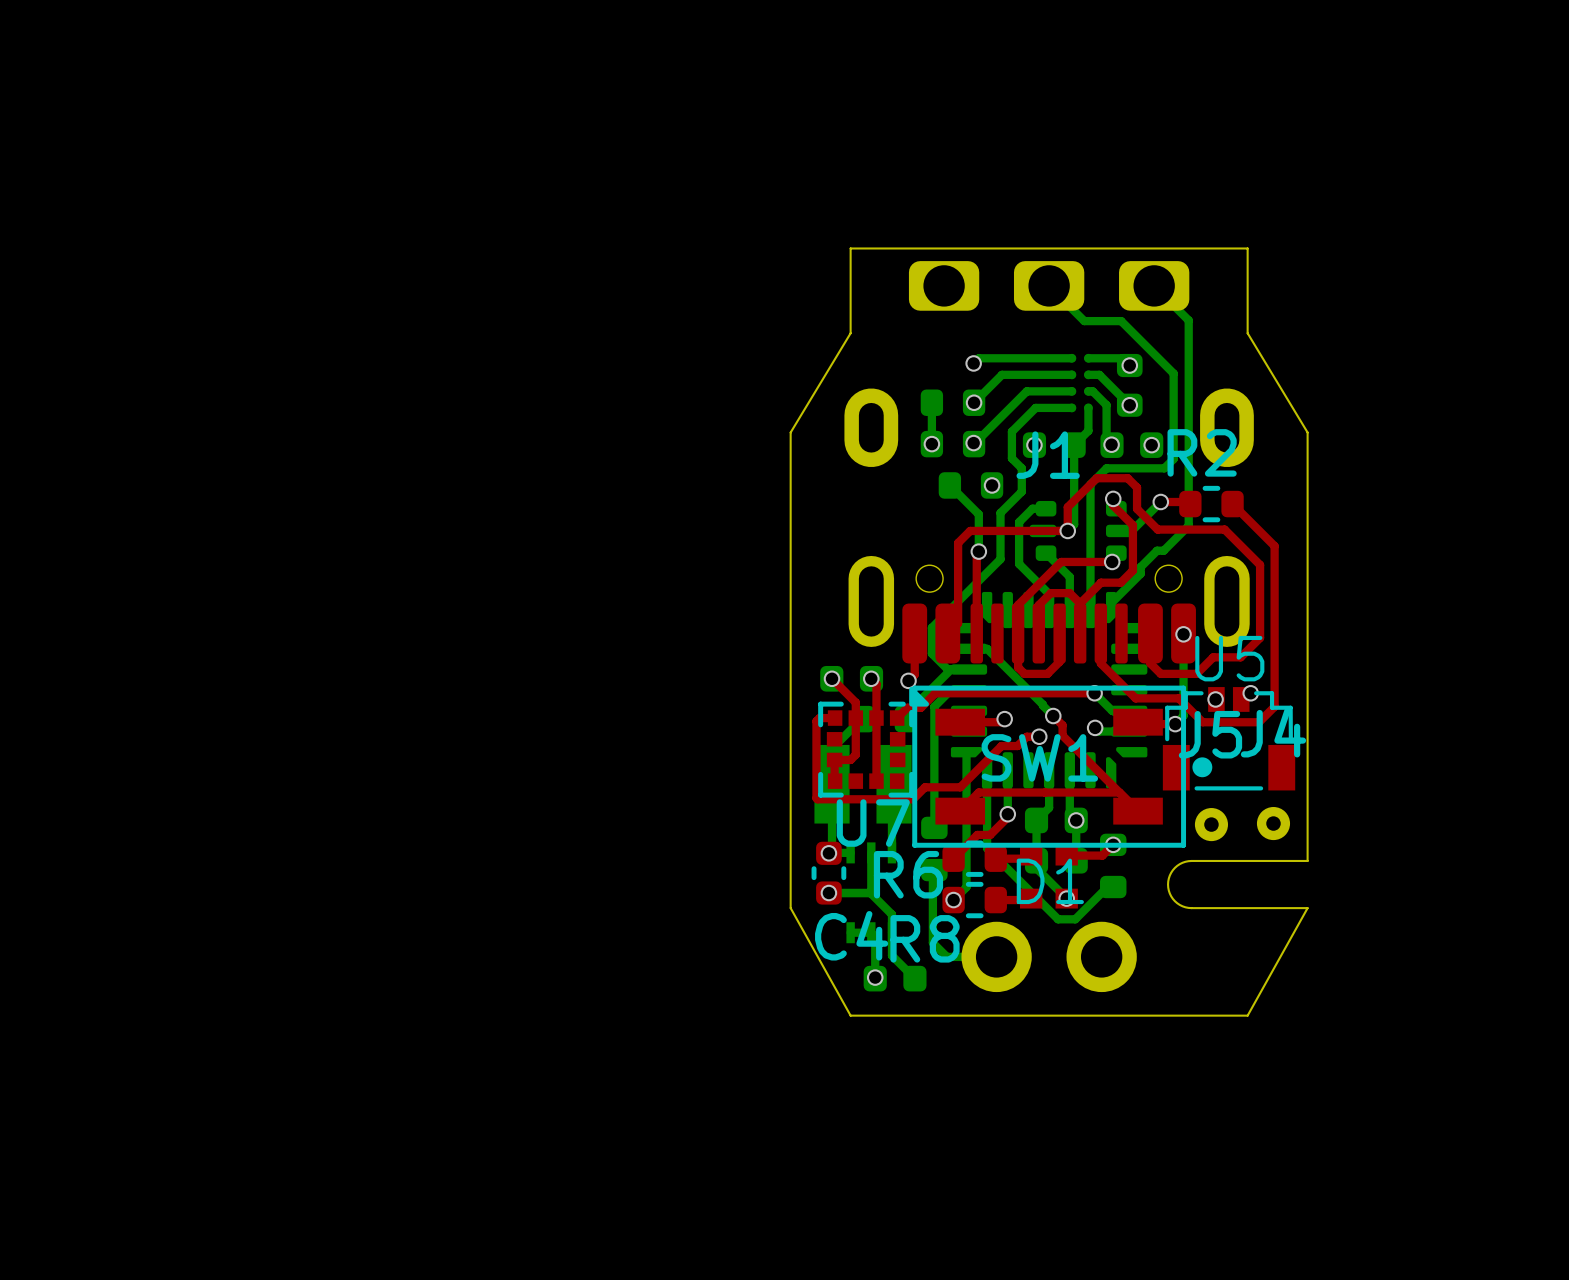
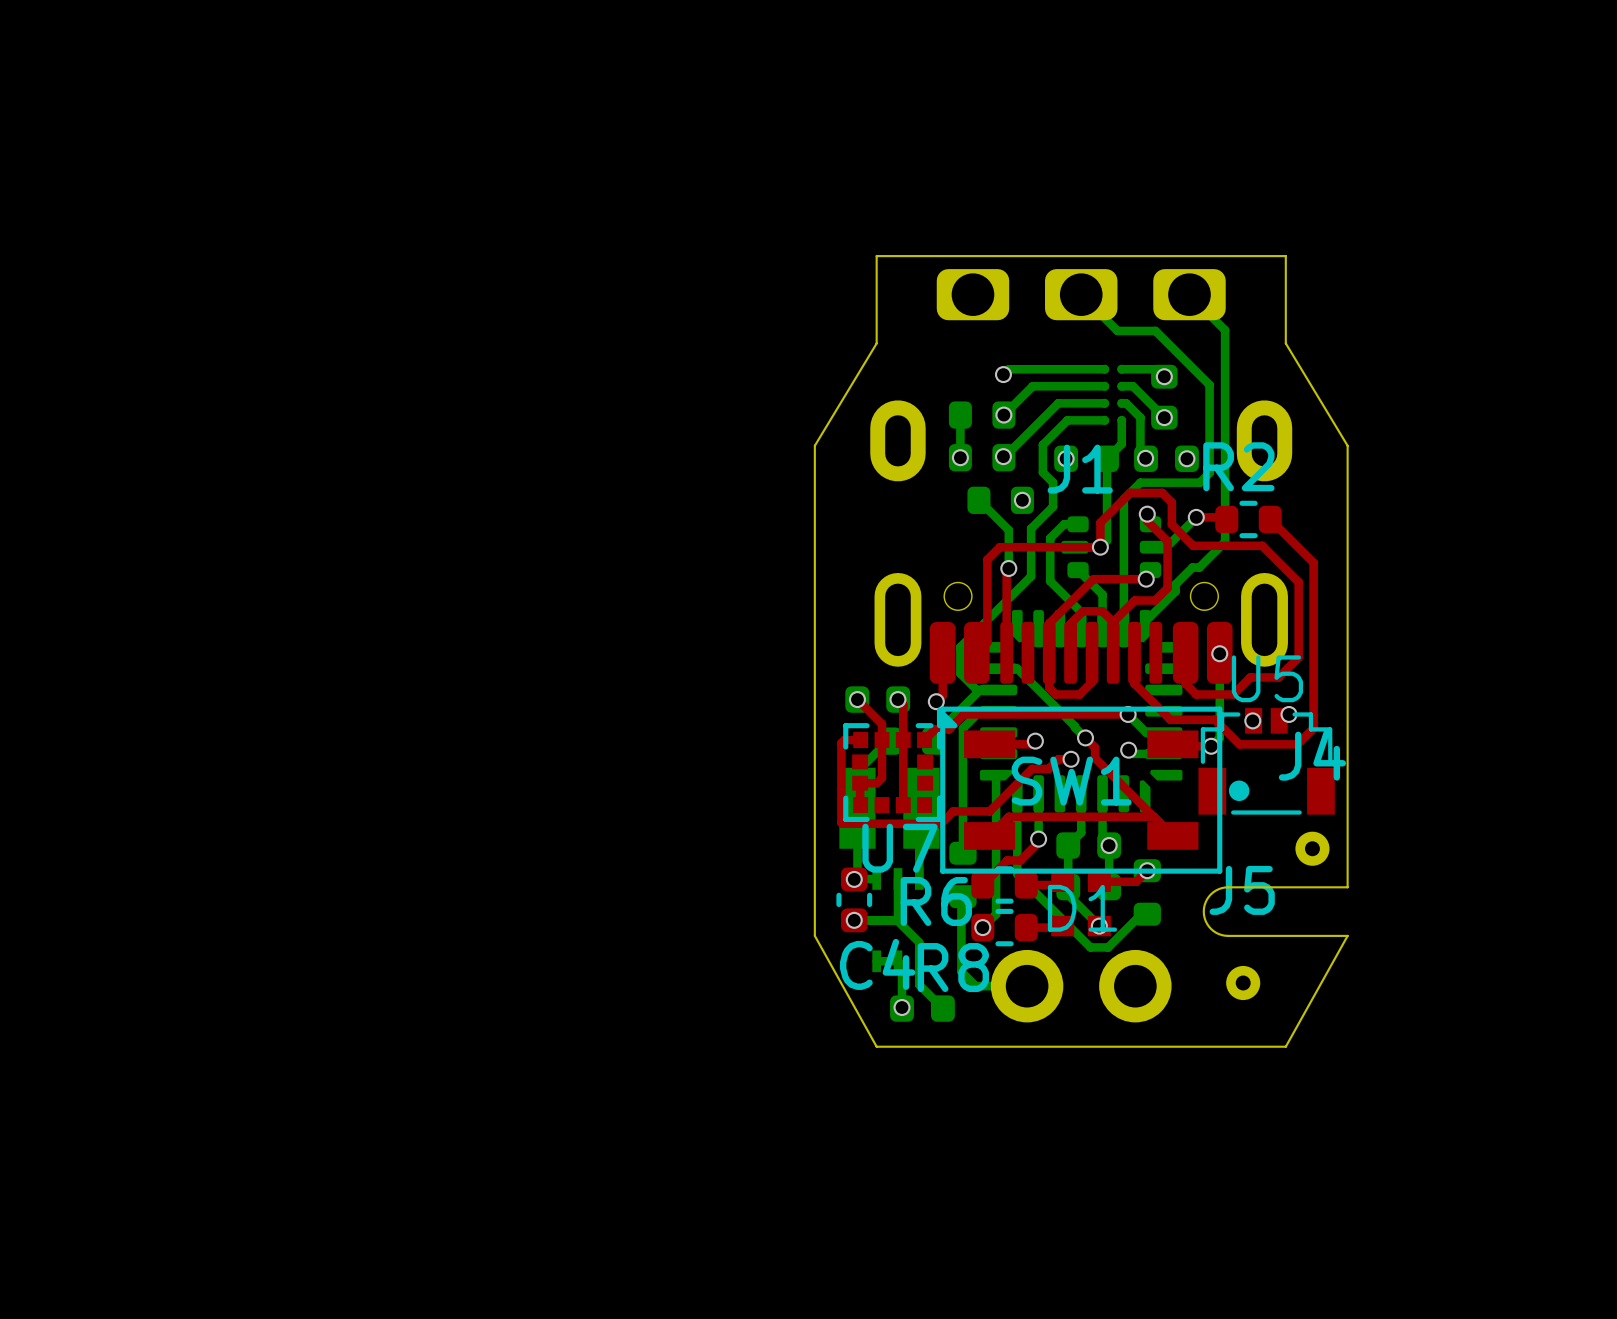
J5 position: (1211, 824) -> (1243, 982)

